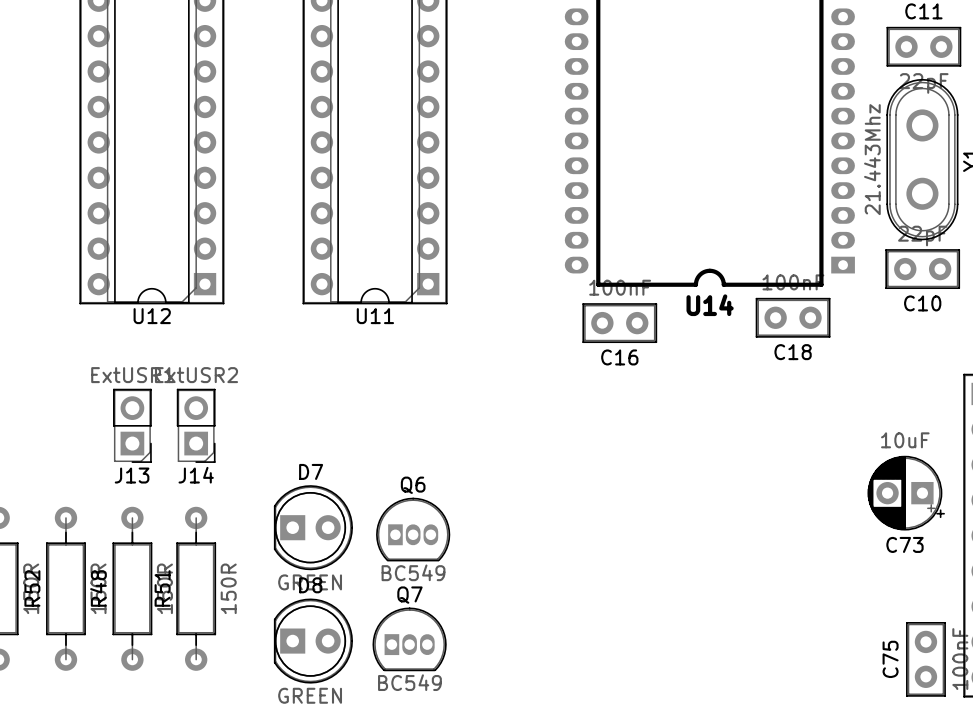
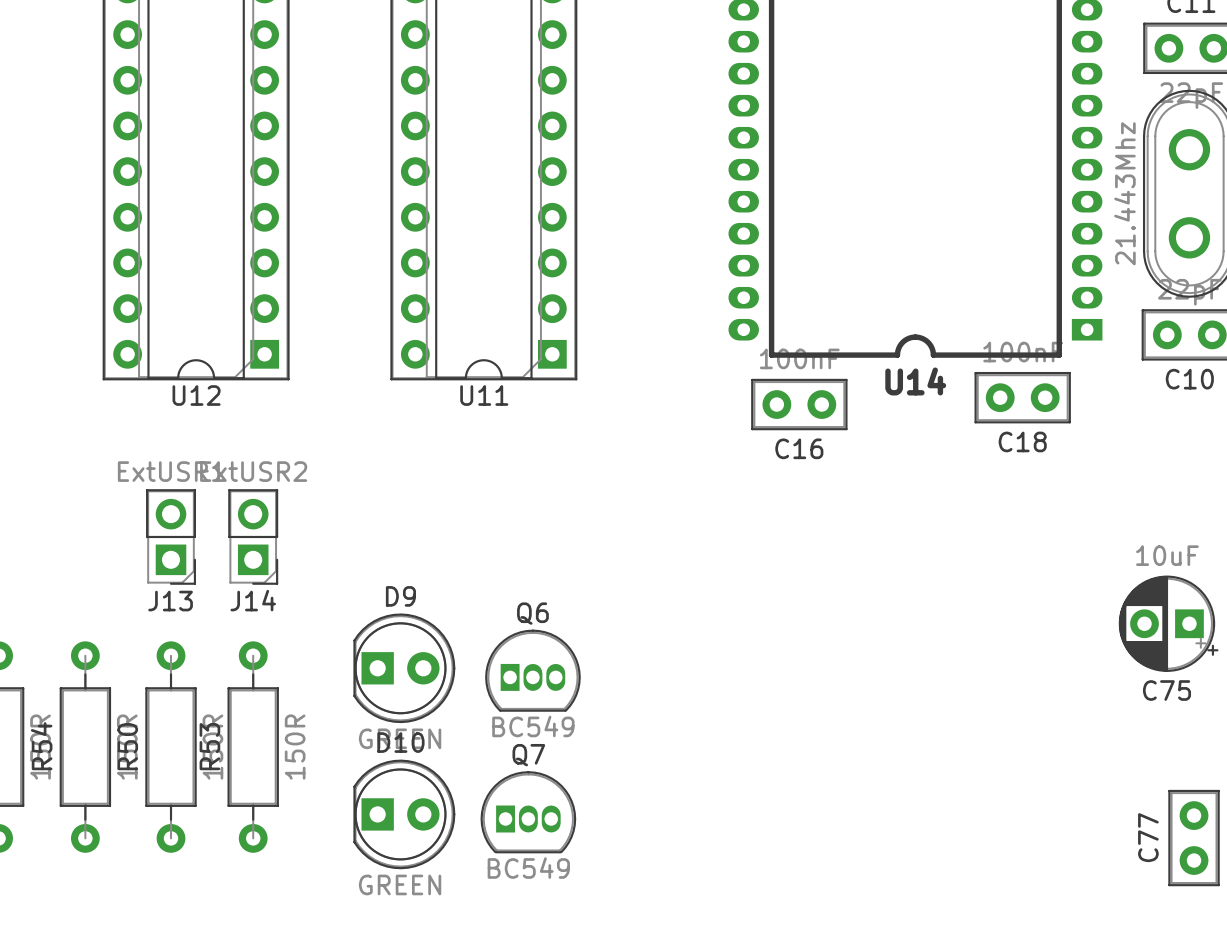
D7 name: D7 (311, 471) -> D9 (400, 596)
C73 name: C73 (904, 544) -> C75 (1166, 690)
D8 name: D8 (310, 585) -> D10 (400, 742)
R52 name: R52 (32, 588) -> R54 (41, 746)
R48 name: R48 (98, 588) -> R50 (127, 746)
R51 name: R51 (162, 588) -> R53 (209, 746)
C75 name: C75 (890, 659) -> C77 (1148, 837)

